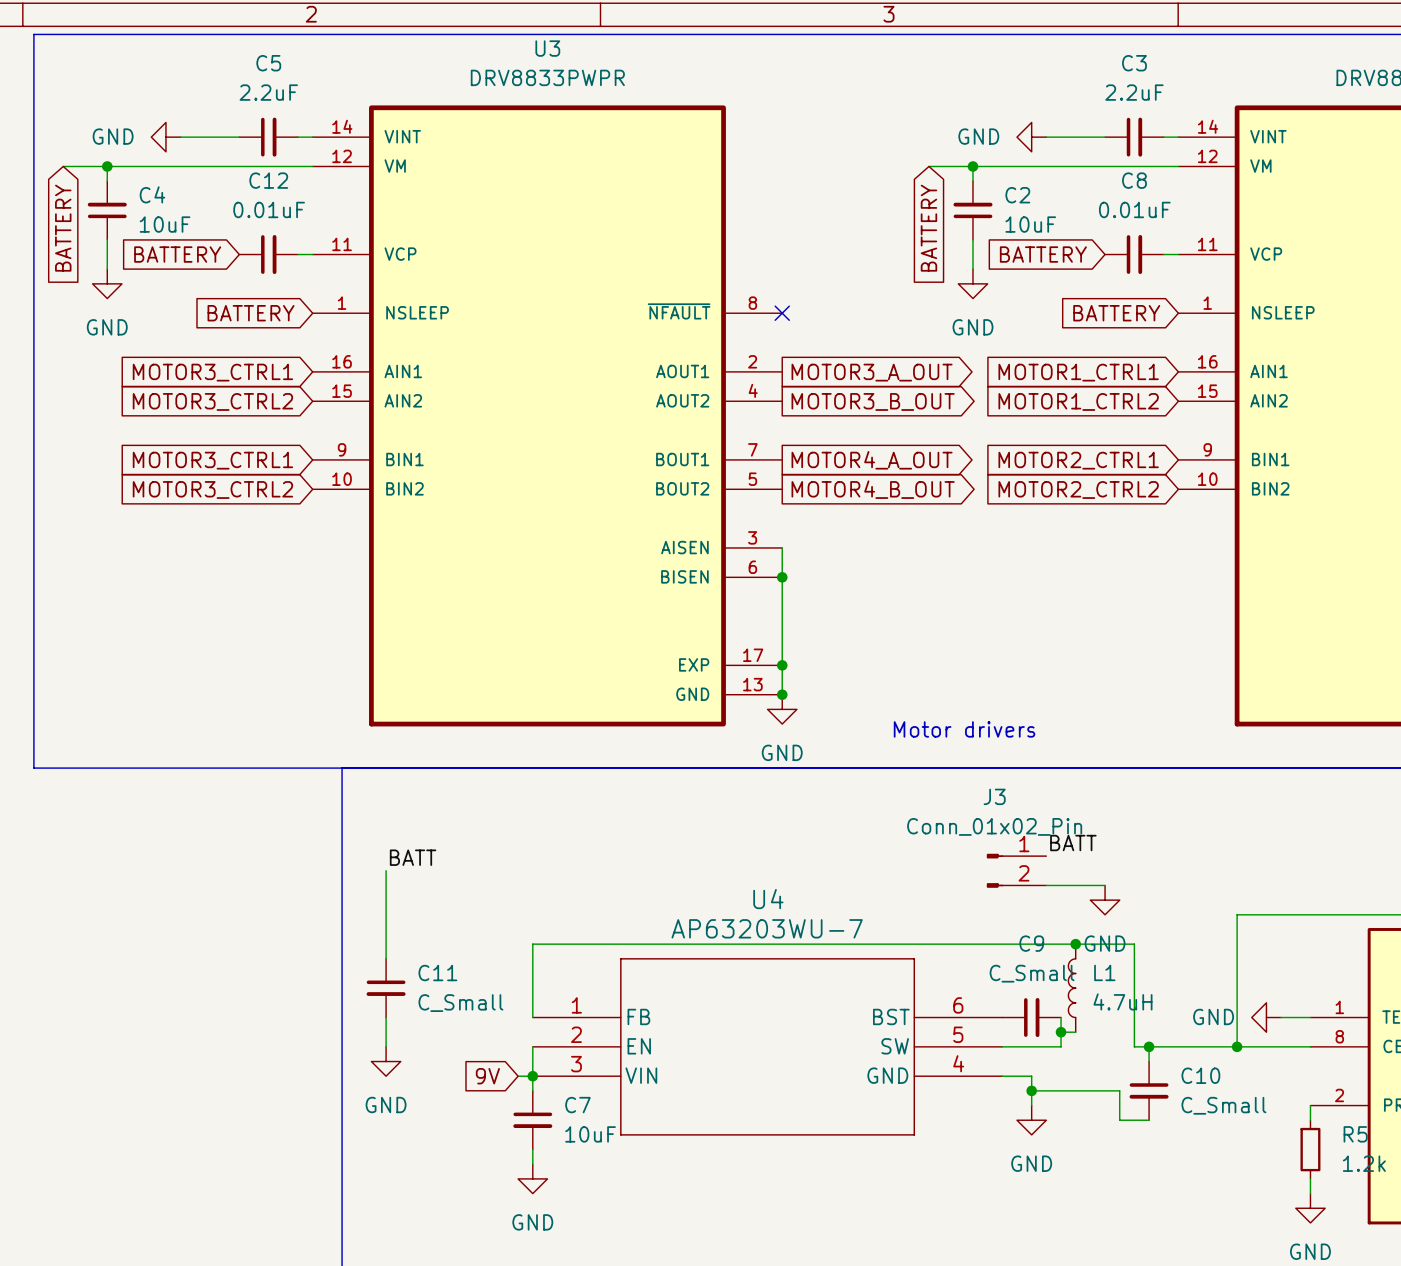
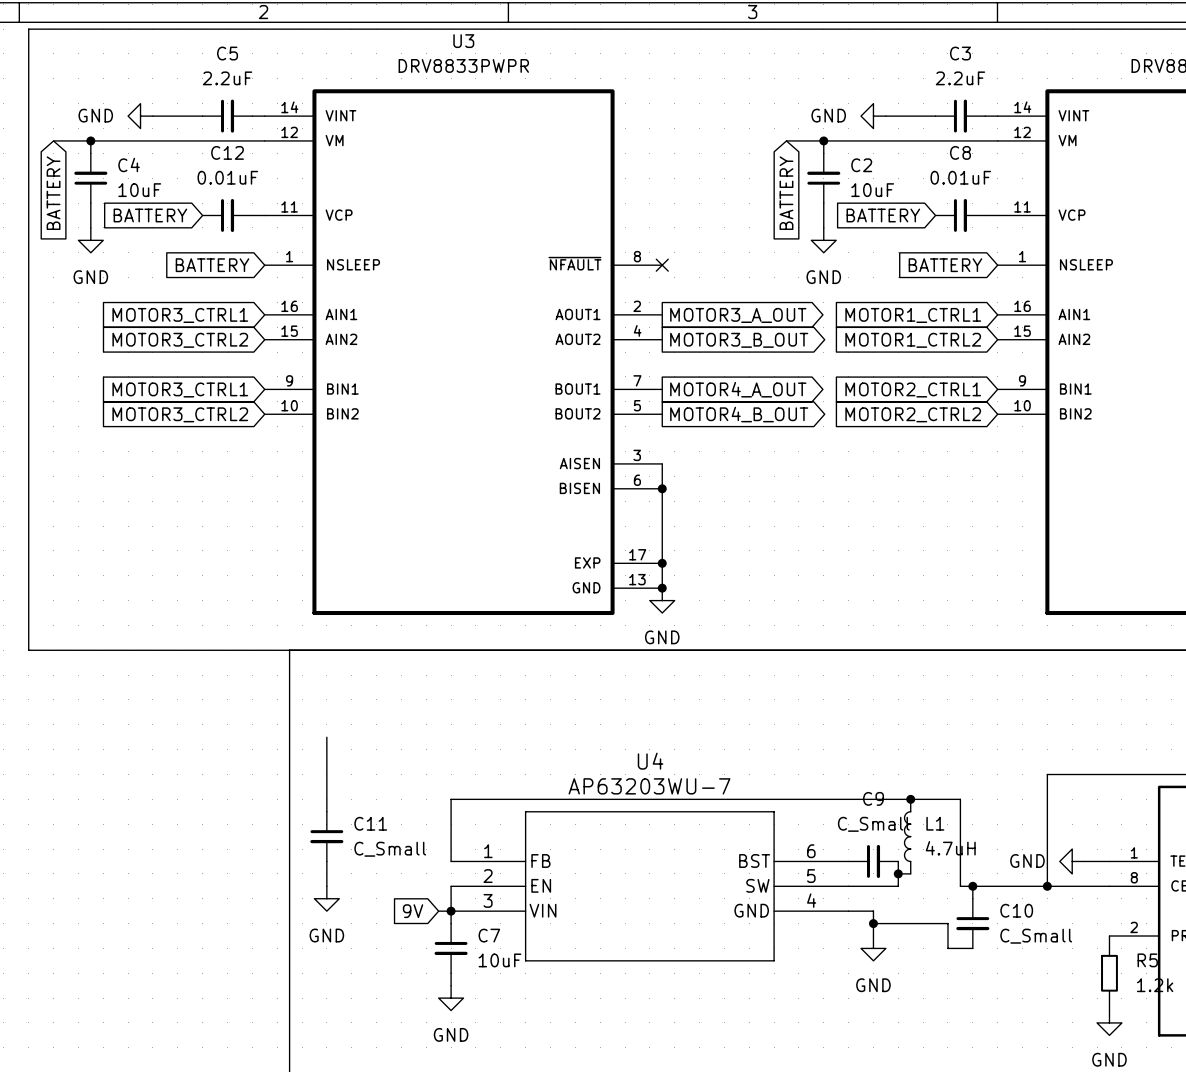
text: Motor drivers (964, 729) -> none
label: BATT (1073, 843) -> none
label: BATT (413, 857) -> none
J3: Conn_01x02_Pin (1016, 870) -> none
wire: (1046, 885) (1105, 885) -> none
power symbol: GND (1105, 900) -> none

